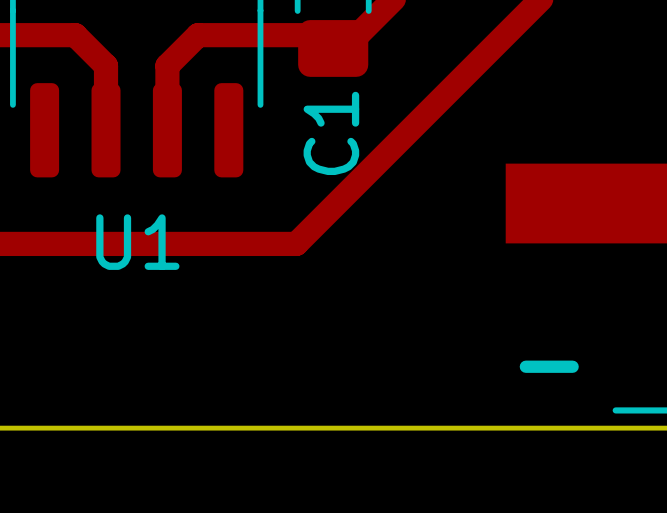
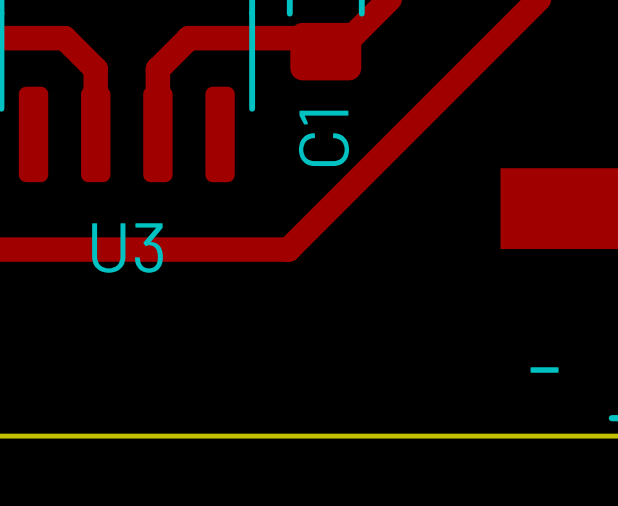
U1 name: U1 (137, 242) -> U3 (127, 248)

